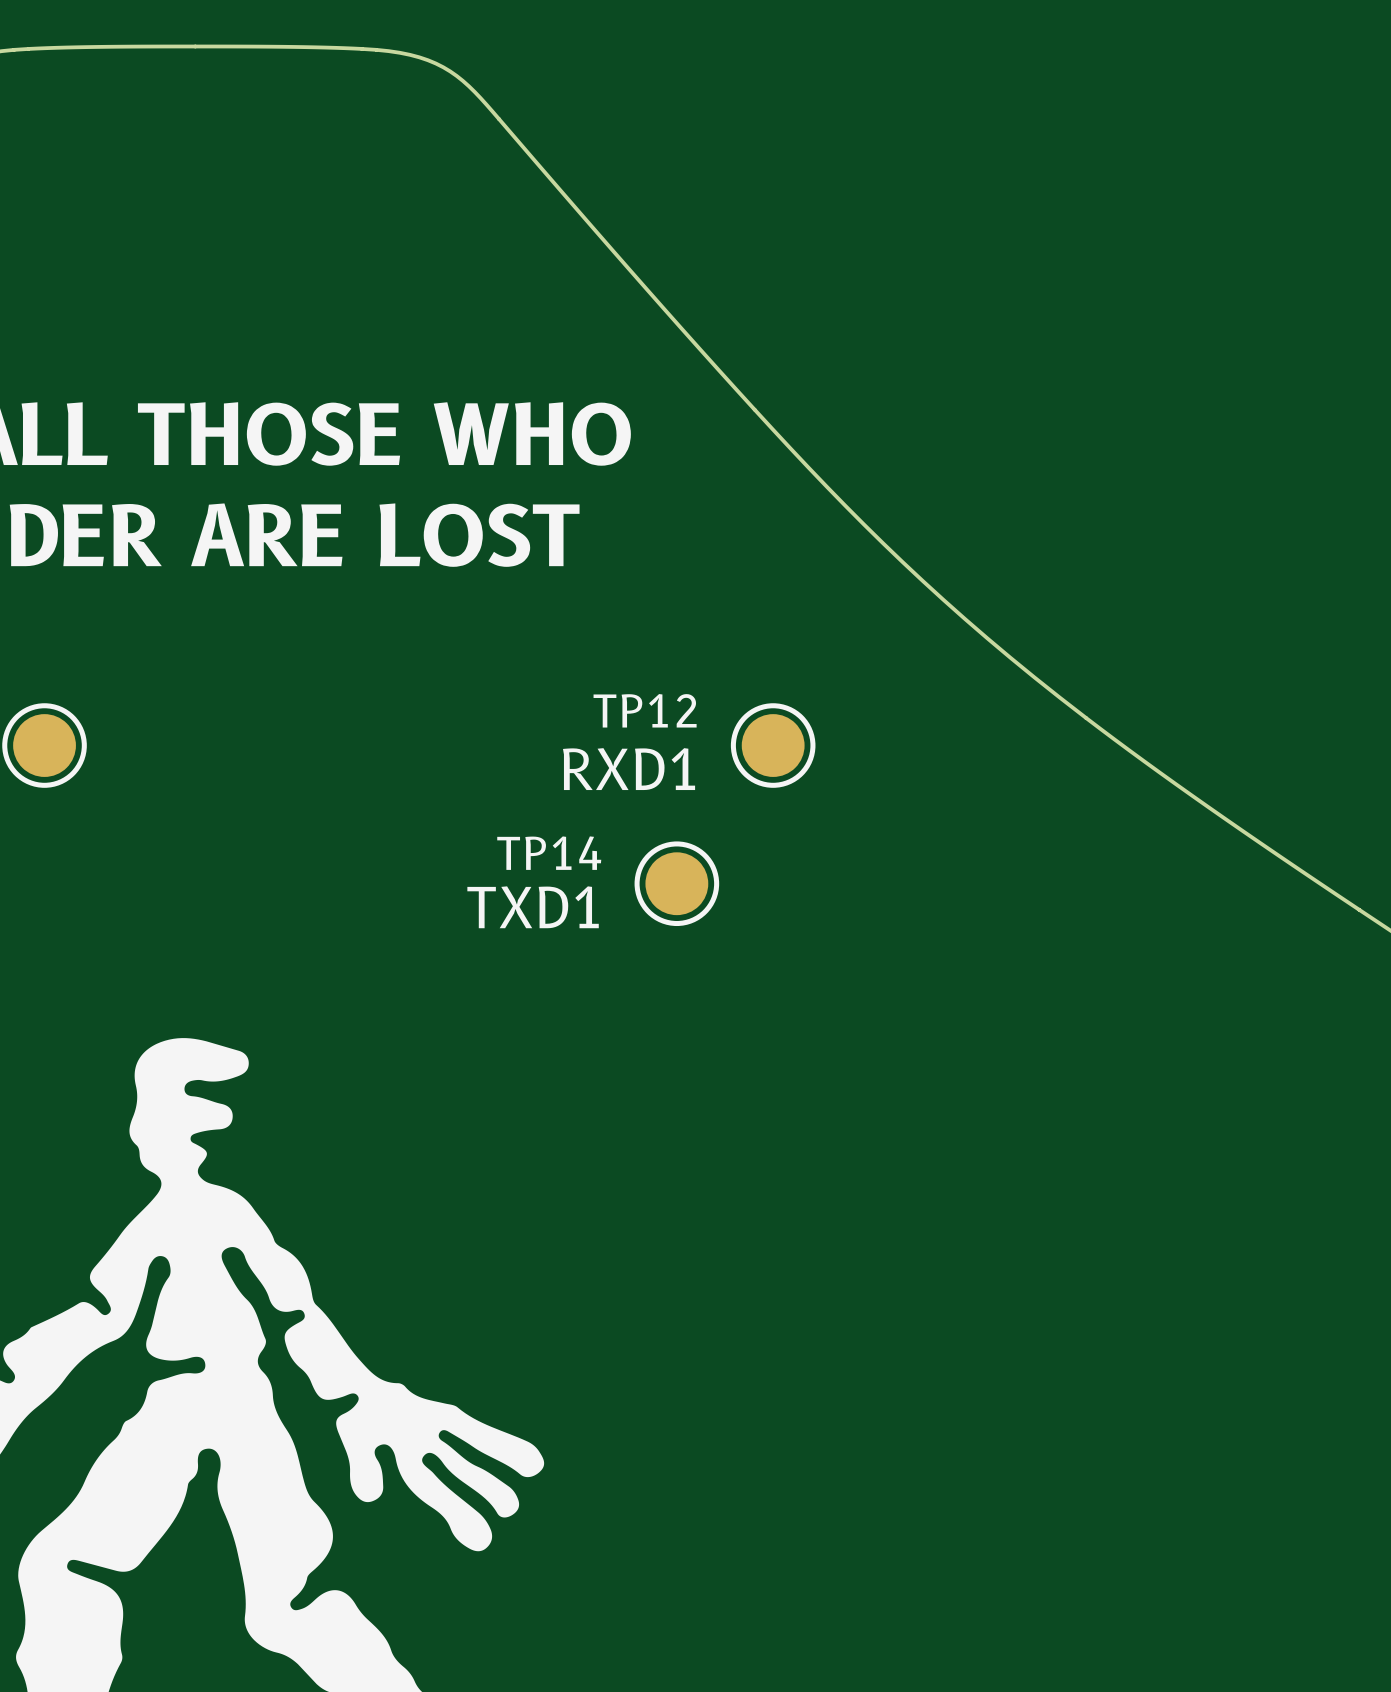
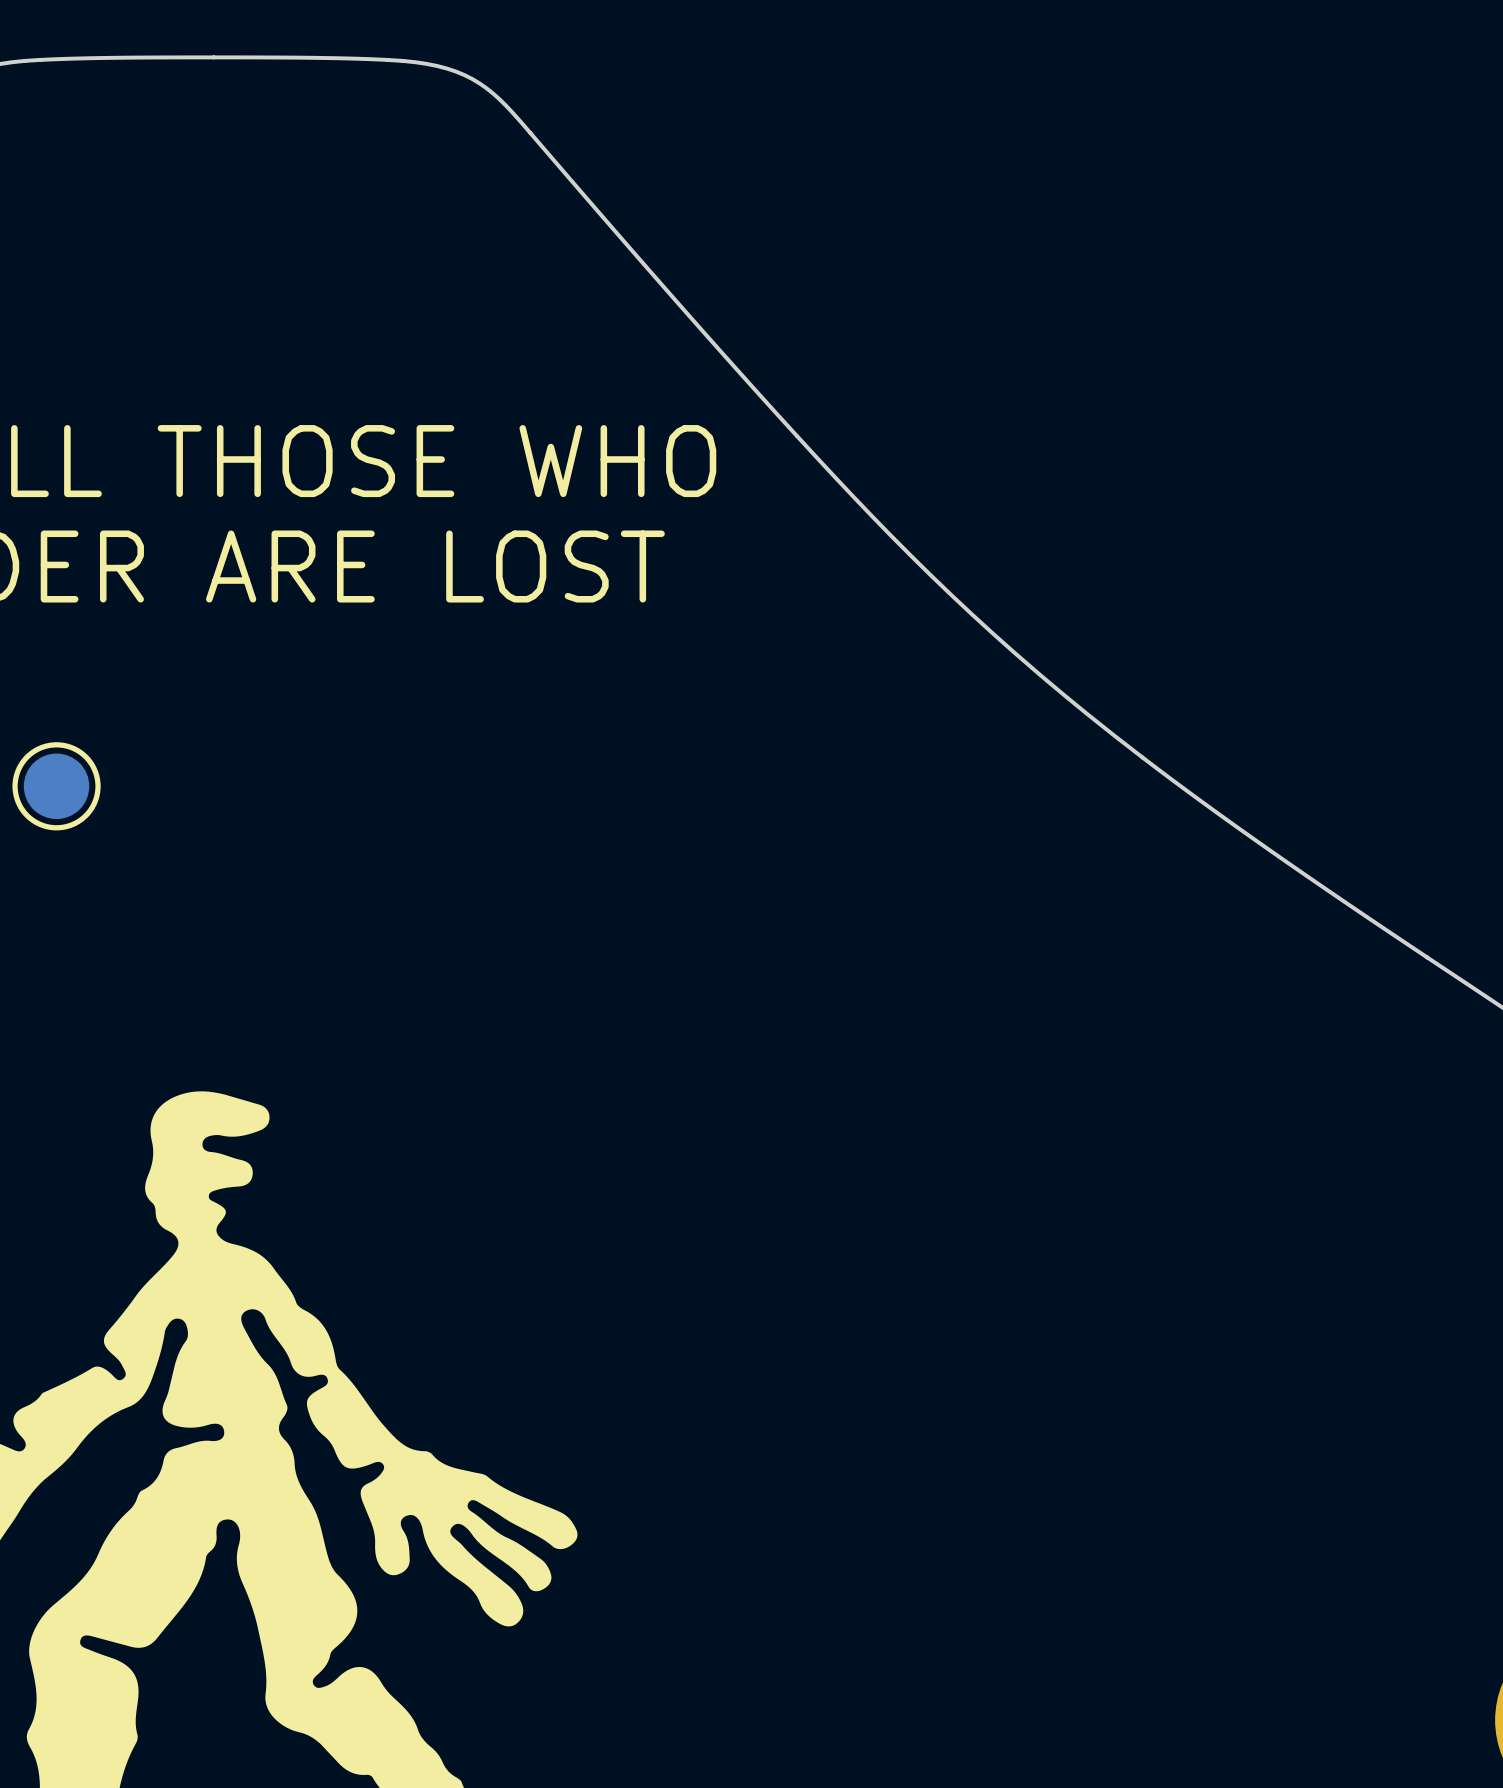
TP12: RXD1 (773, 745) -> none
TP14: TXD1 (676, 883) -> none

